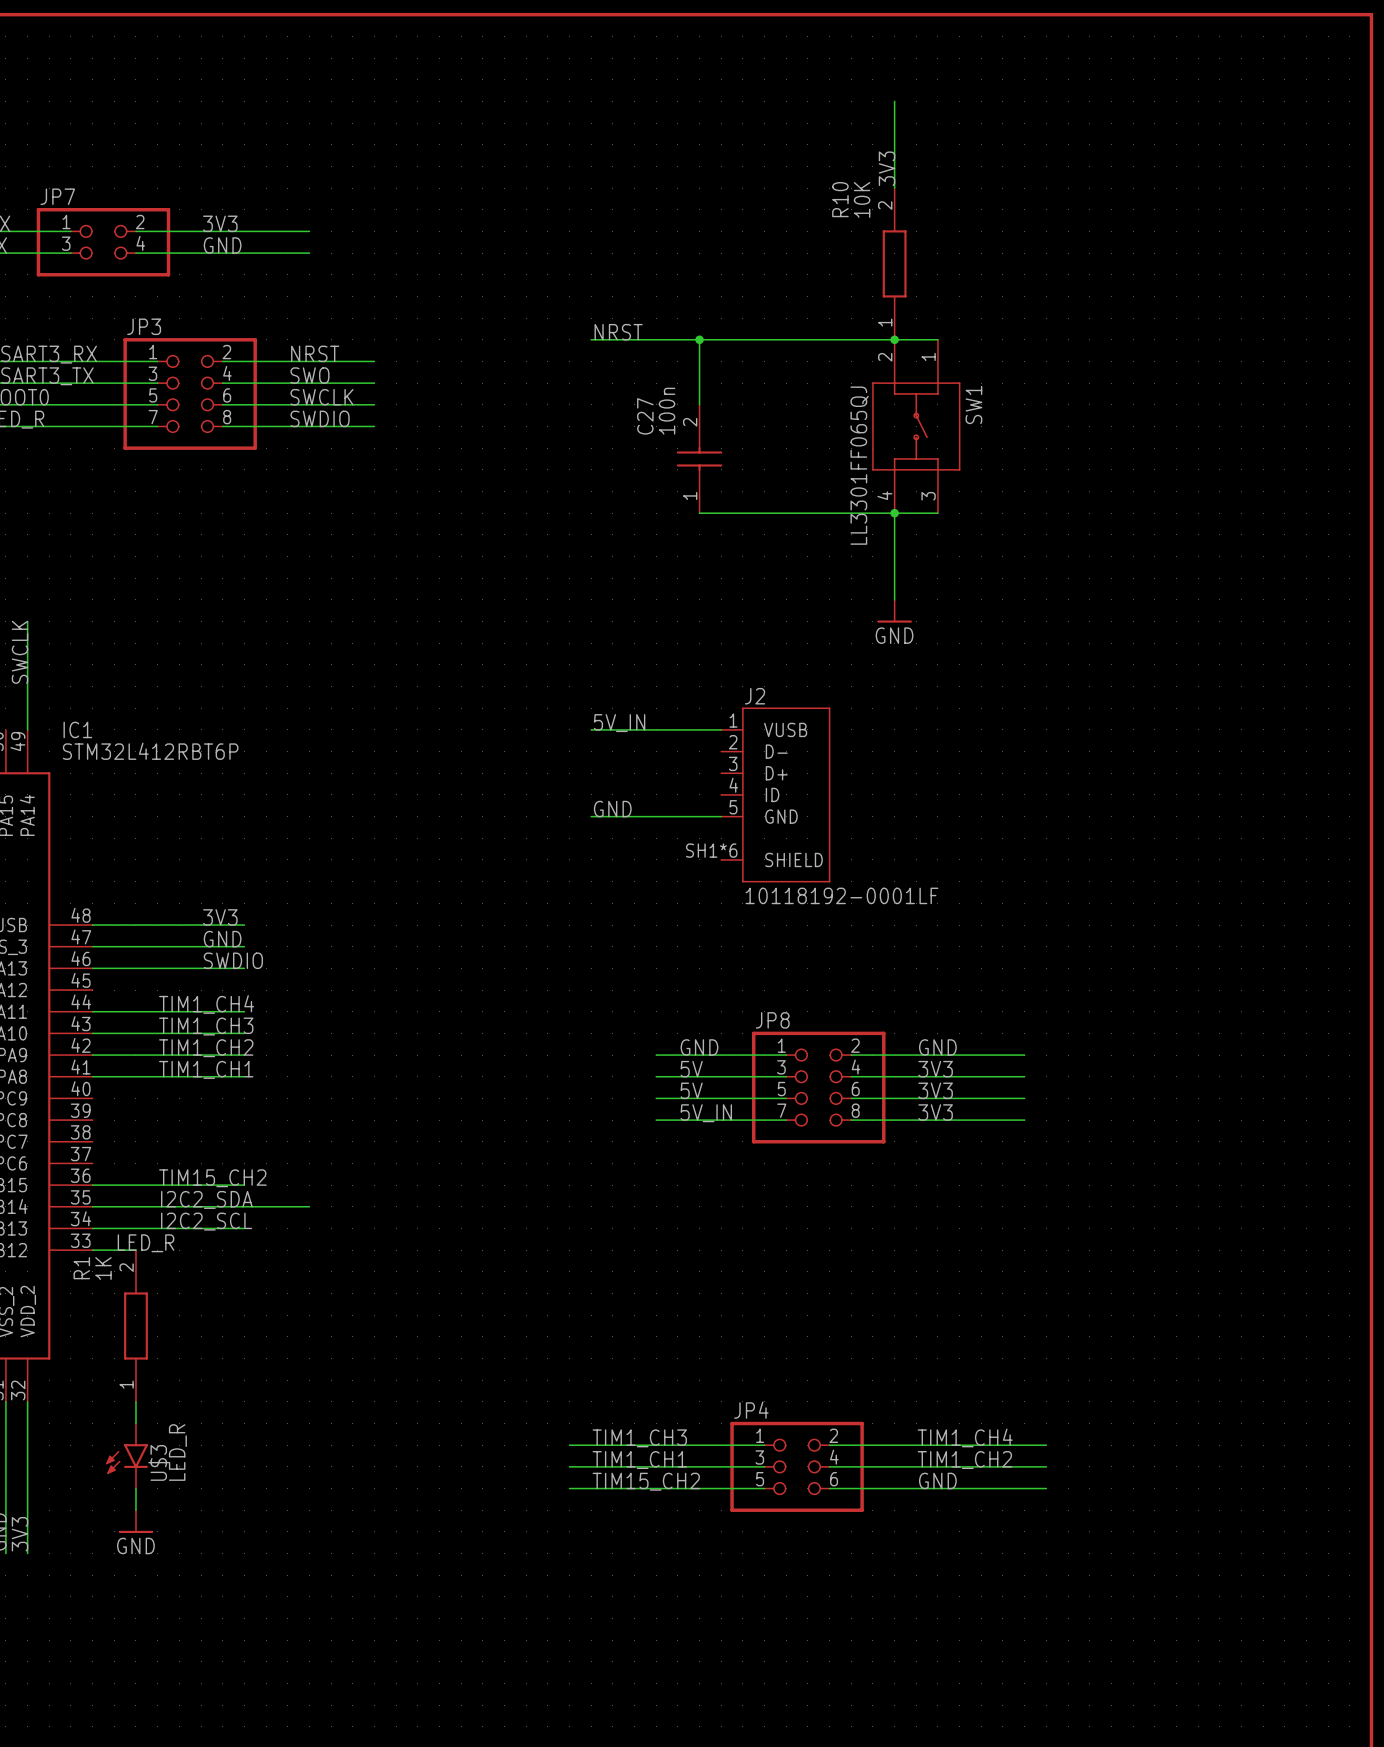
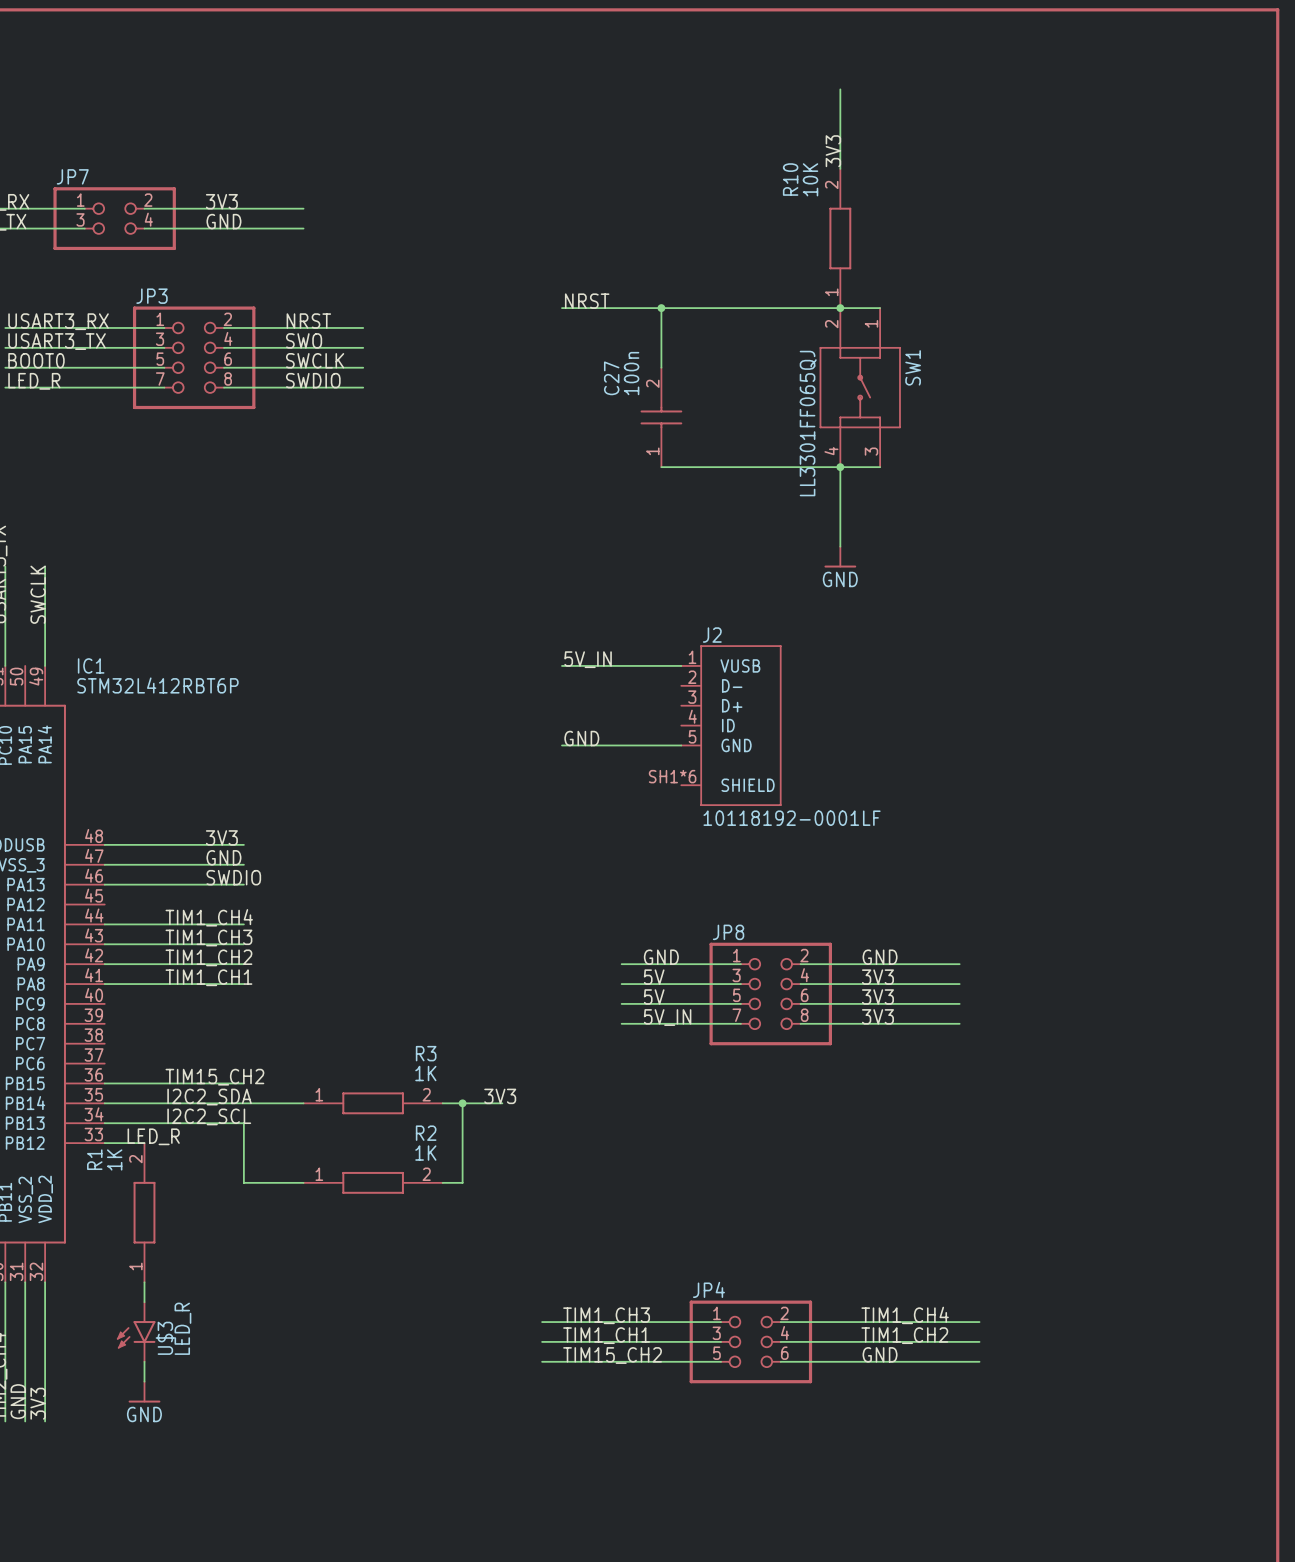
label: none -> 3V3 (500, 1096)
R3: none -> 1K (373, 1103)
wire: none -> (442, 1103) (502, 1103)
wire: none -> (462, 1103) (462, 1182) (442, 1182)
junction: none -> (462, 1103)
wire: none -> (243, 1123) (243, 1182) (303, 1182)
R2: none -> 1K (373, 1182)

